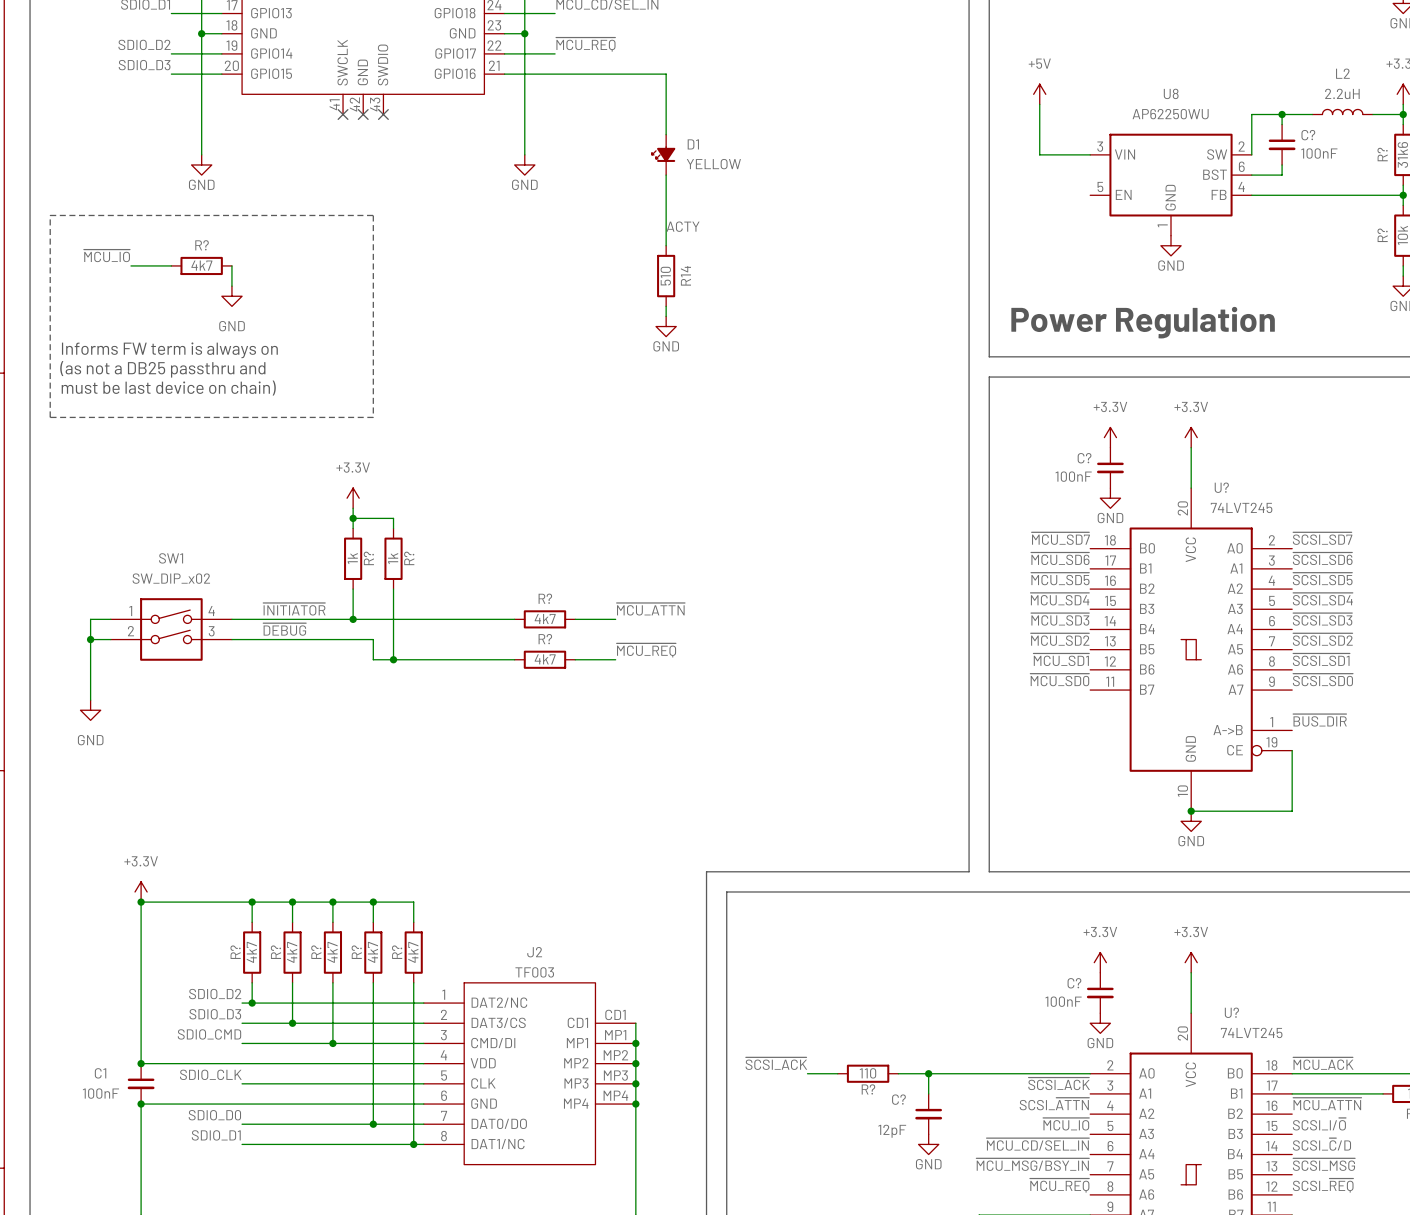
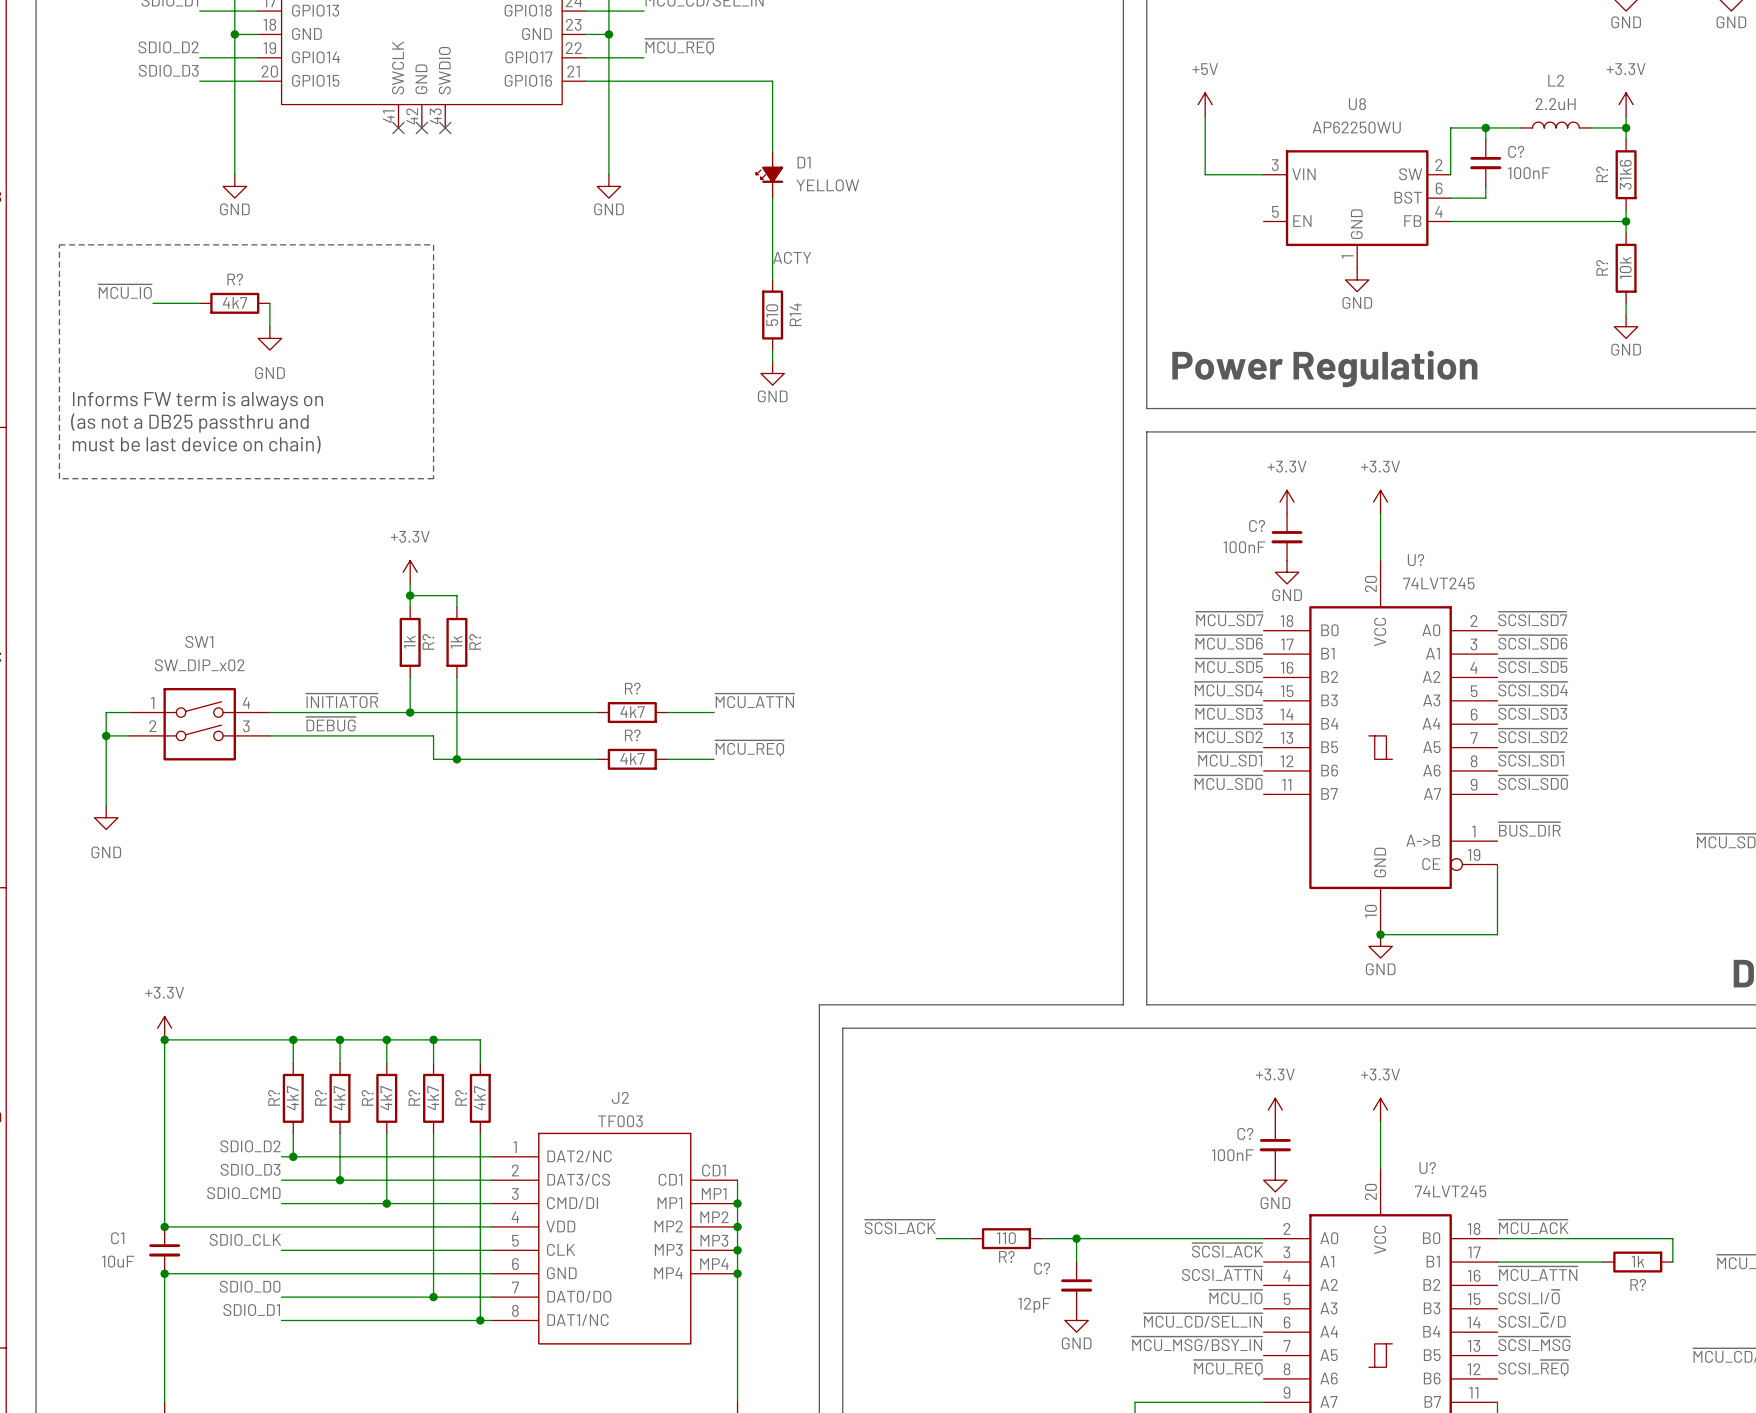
C1 value: 100nF (100, 1093) -> 10uF (118, 1261)

